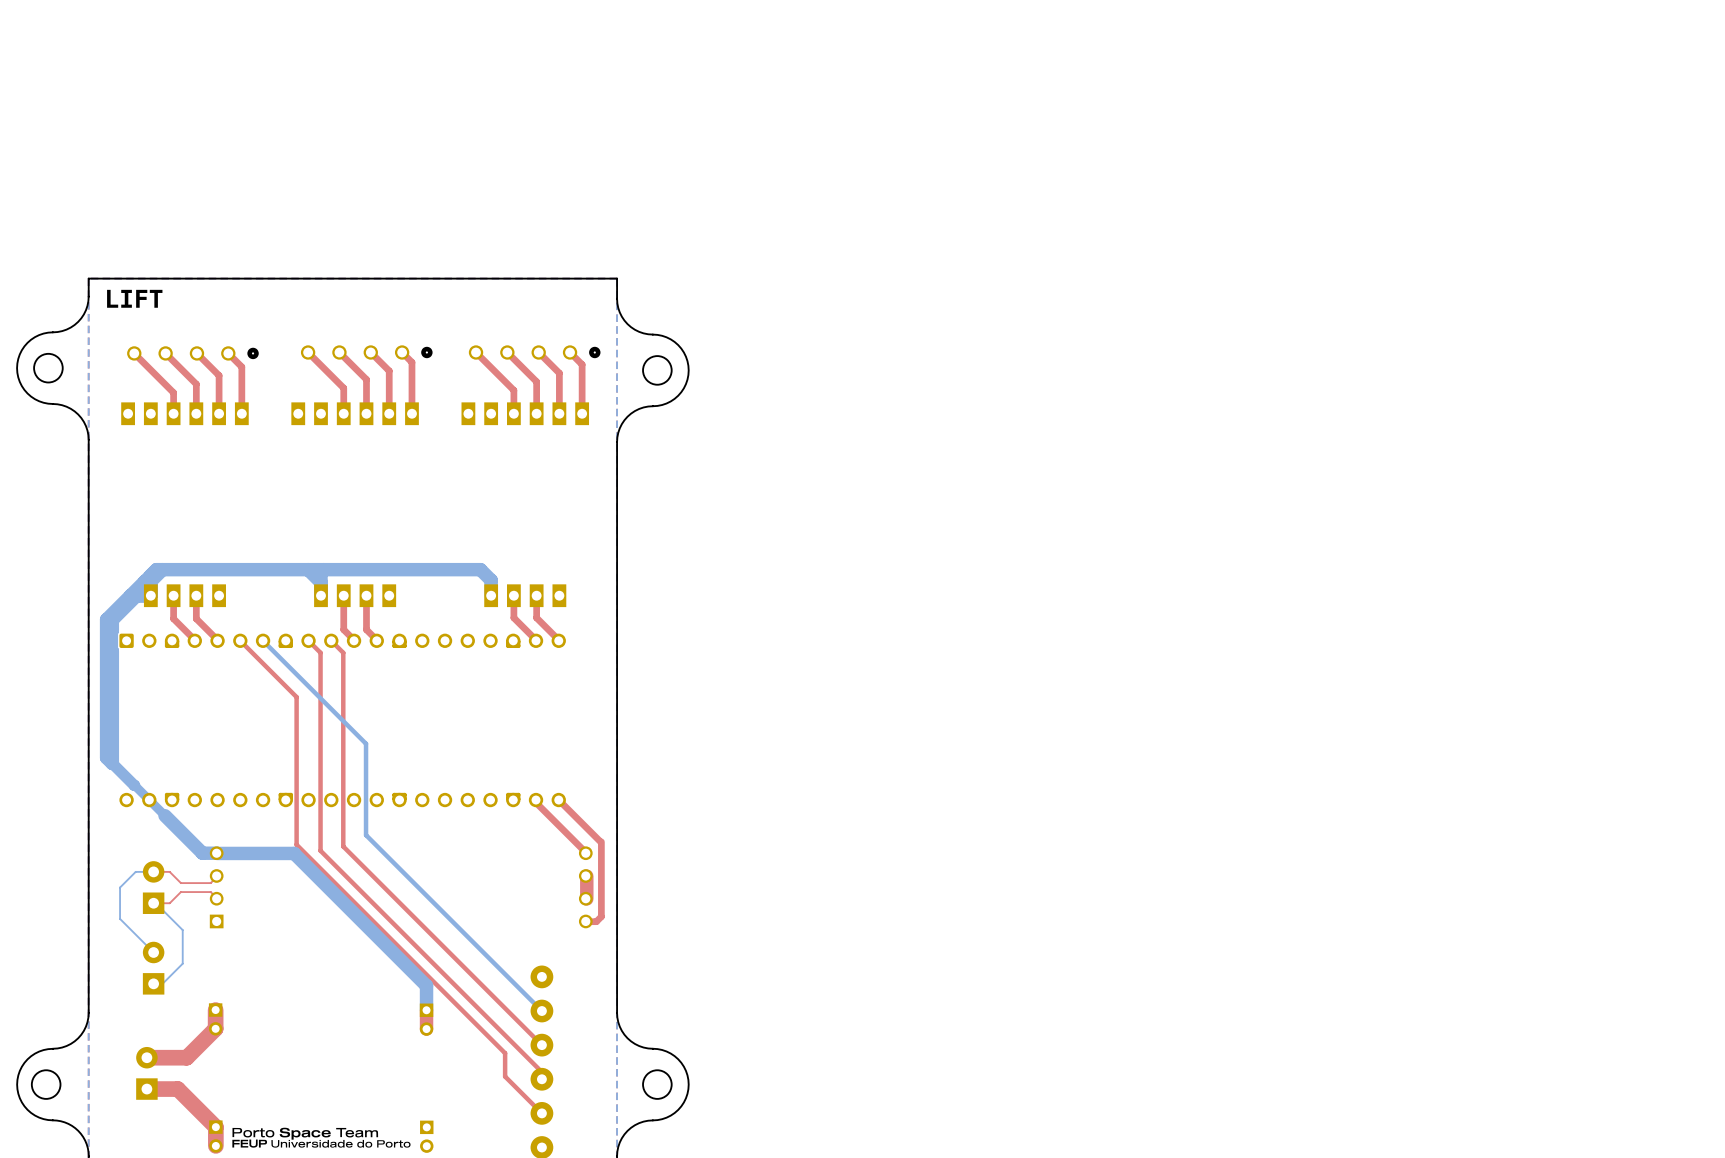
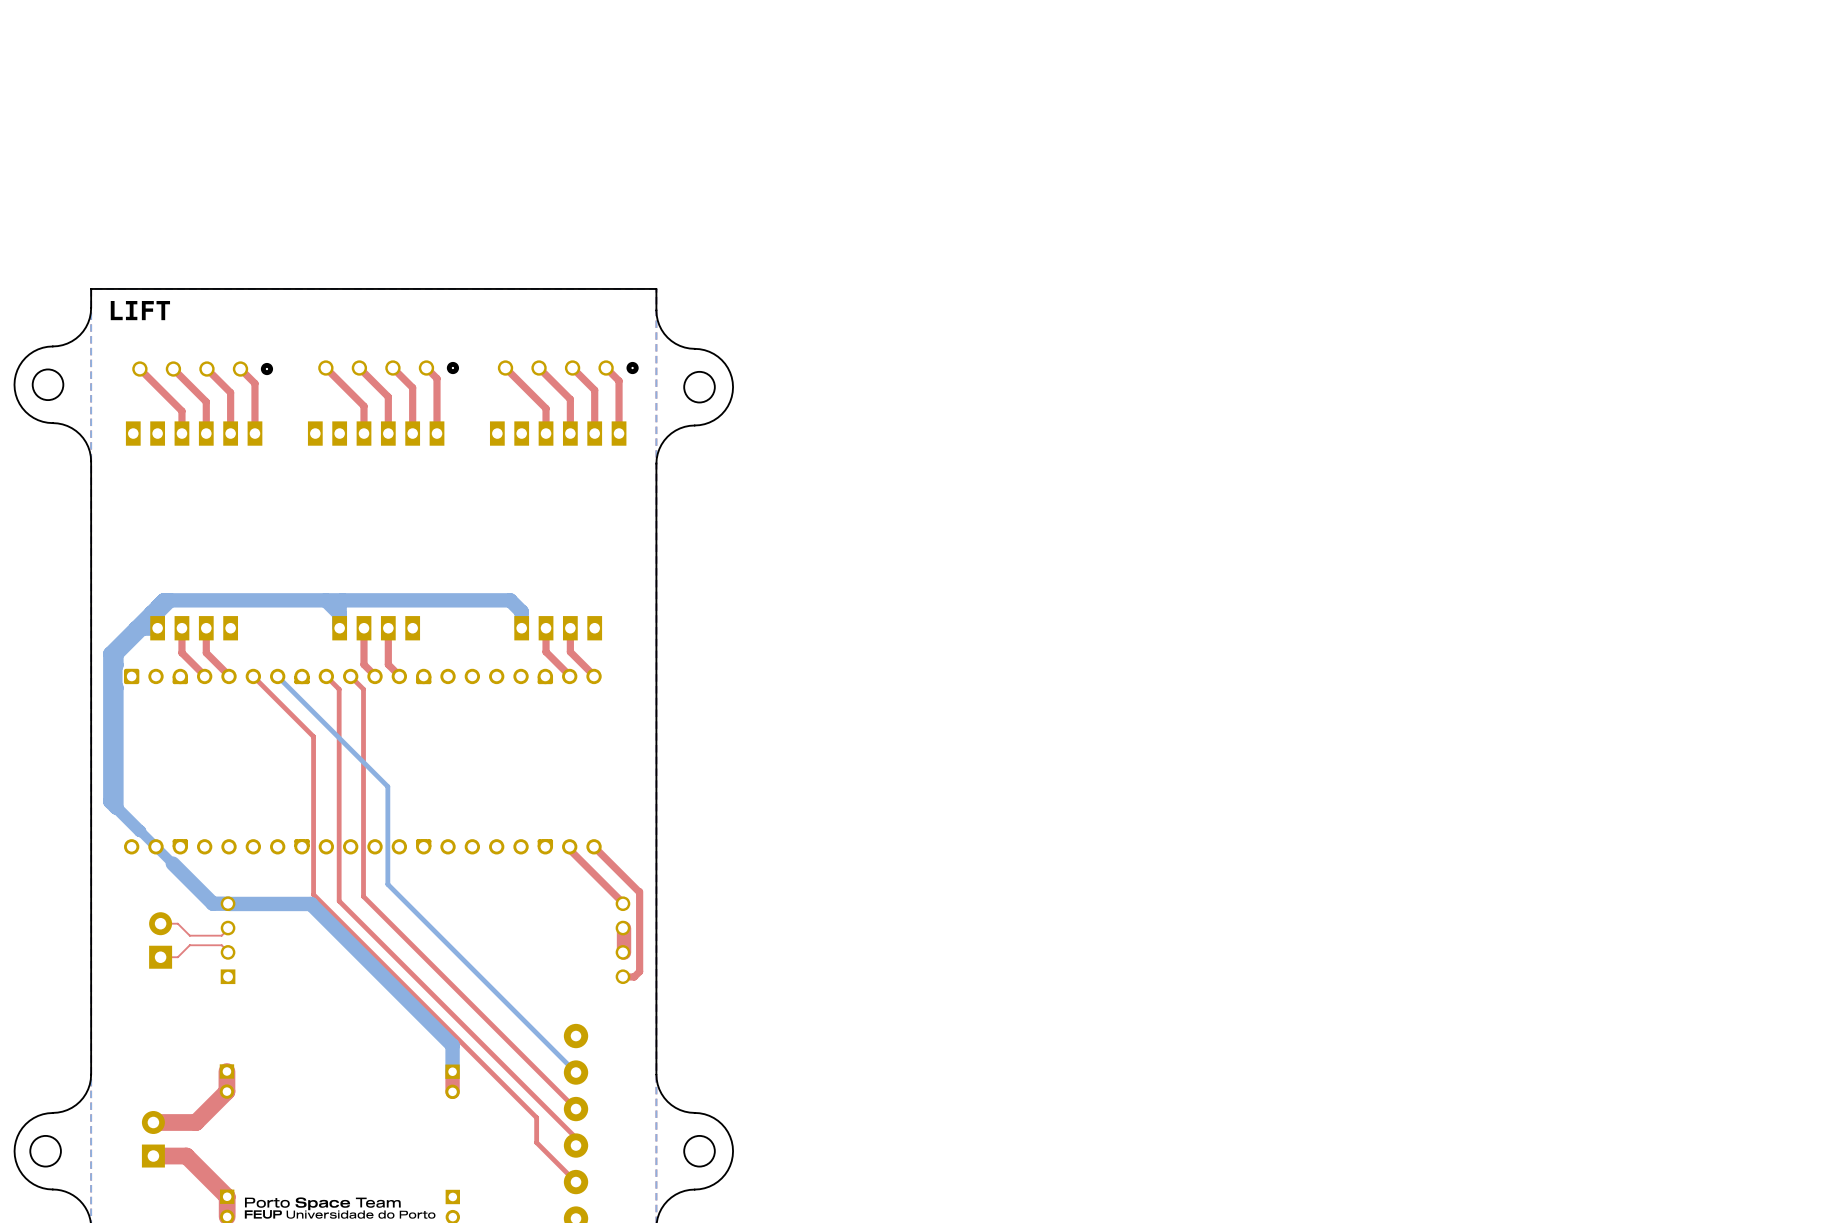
bottom track: (153, 871) (135, 871) (120, 887) (120, 918) (153, 952) -> none
bottom track: (153, 903) (155, 903) (182, 930) (182, 963) (162, 983) (153, 983) -> none
part: (153, 968) -> none

